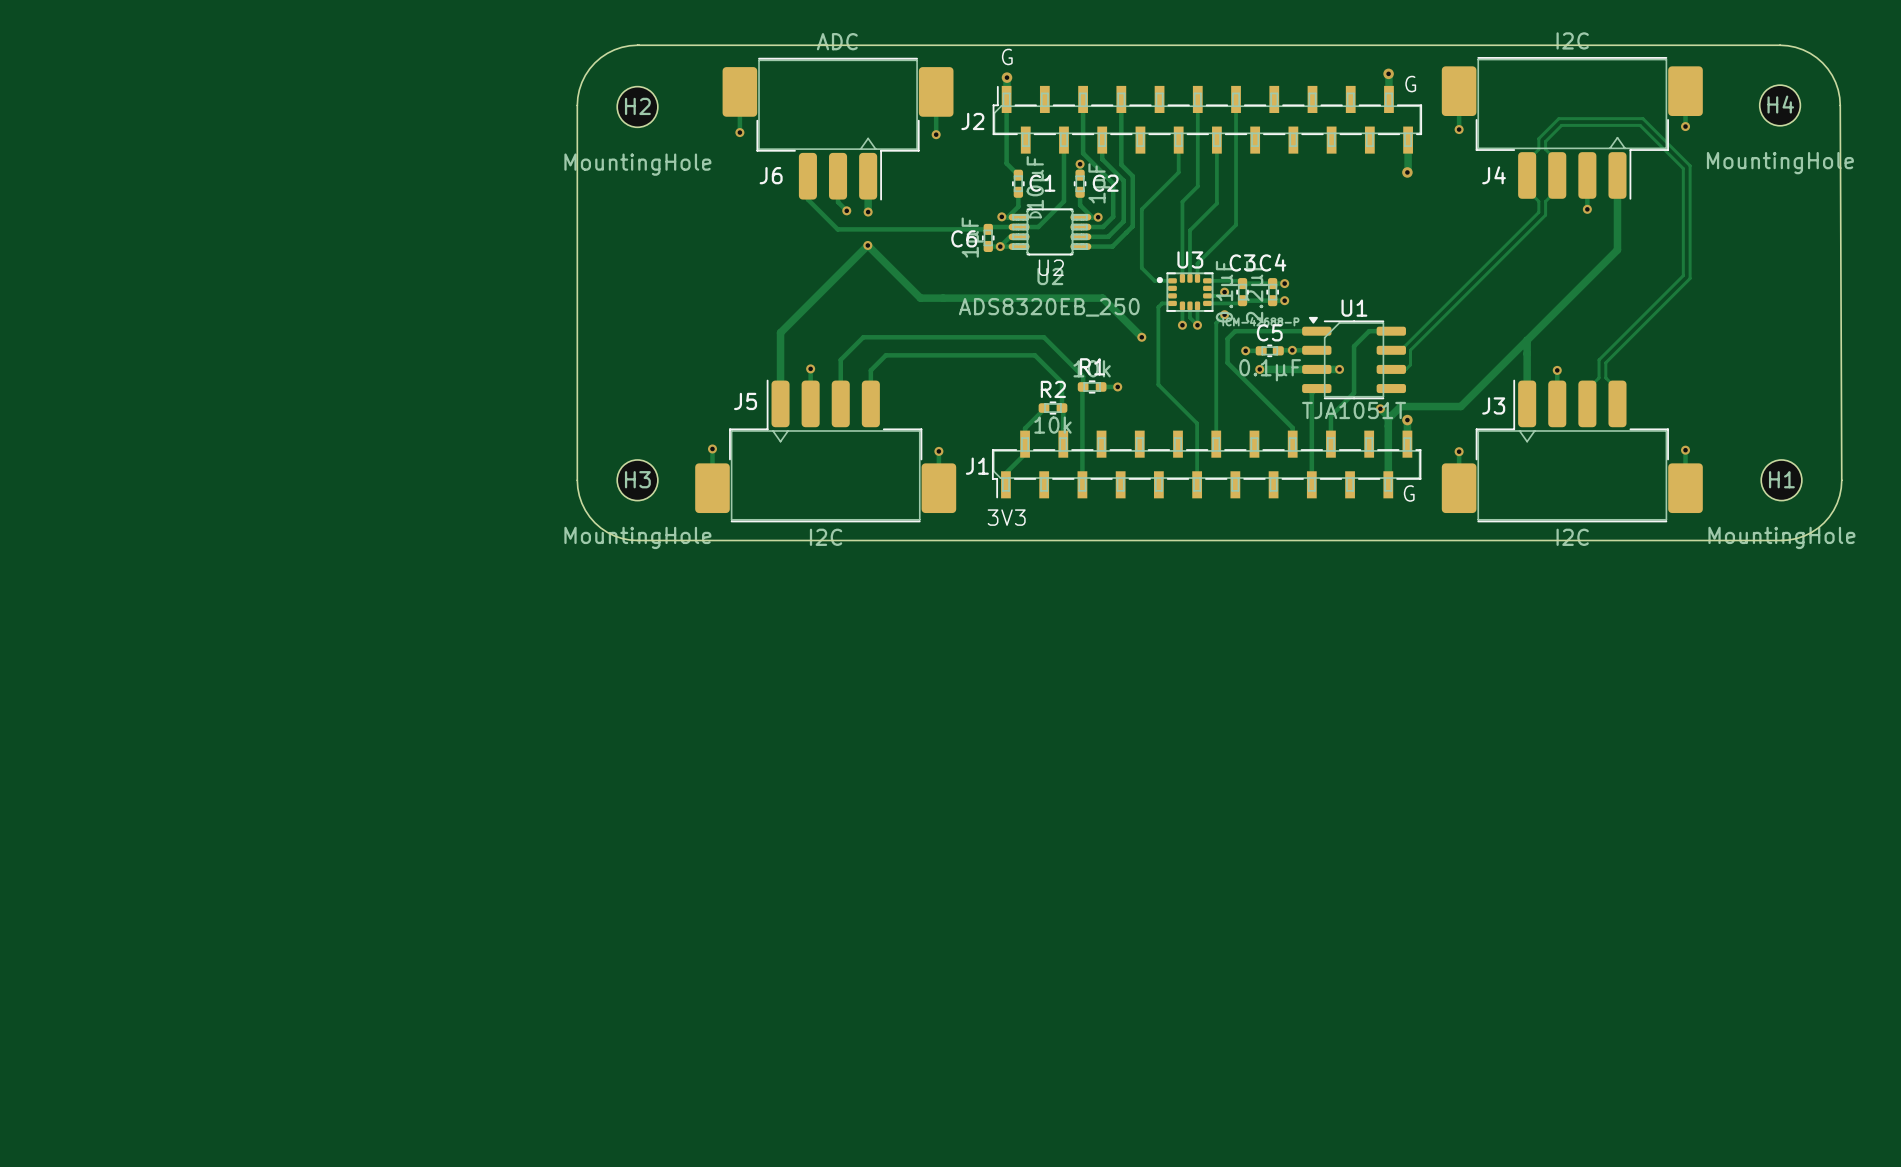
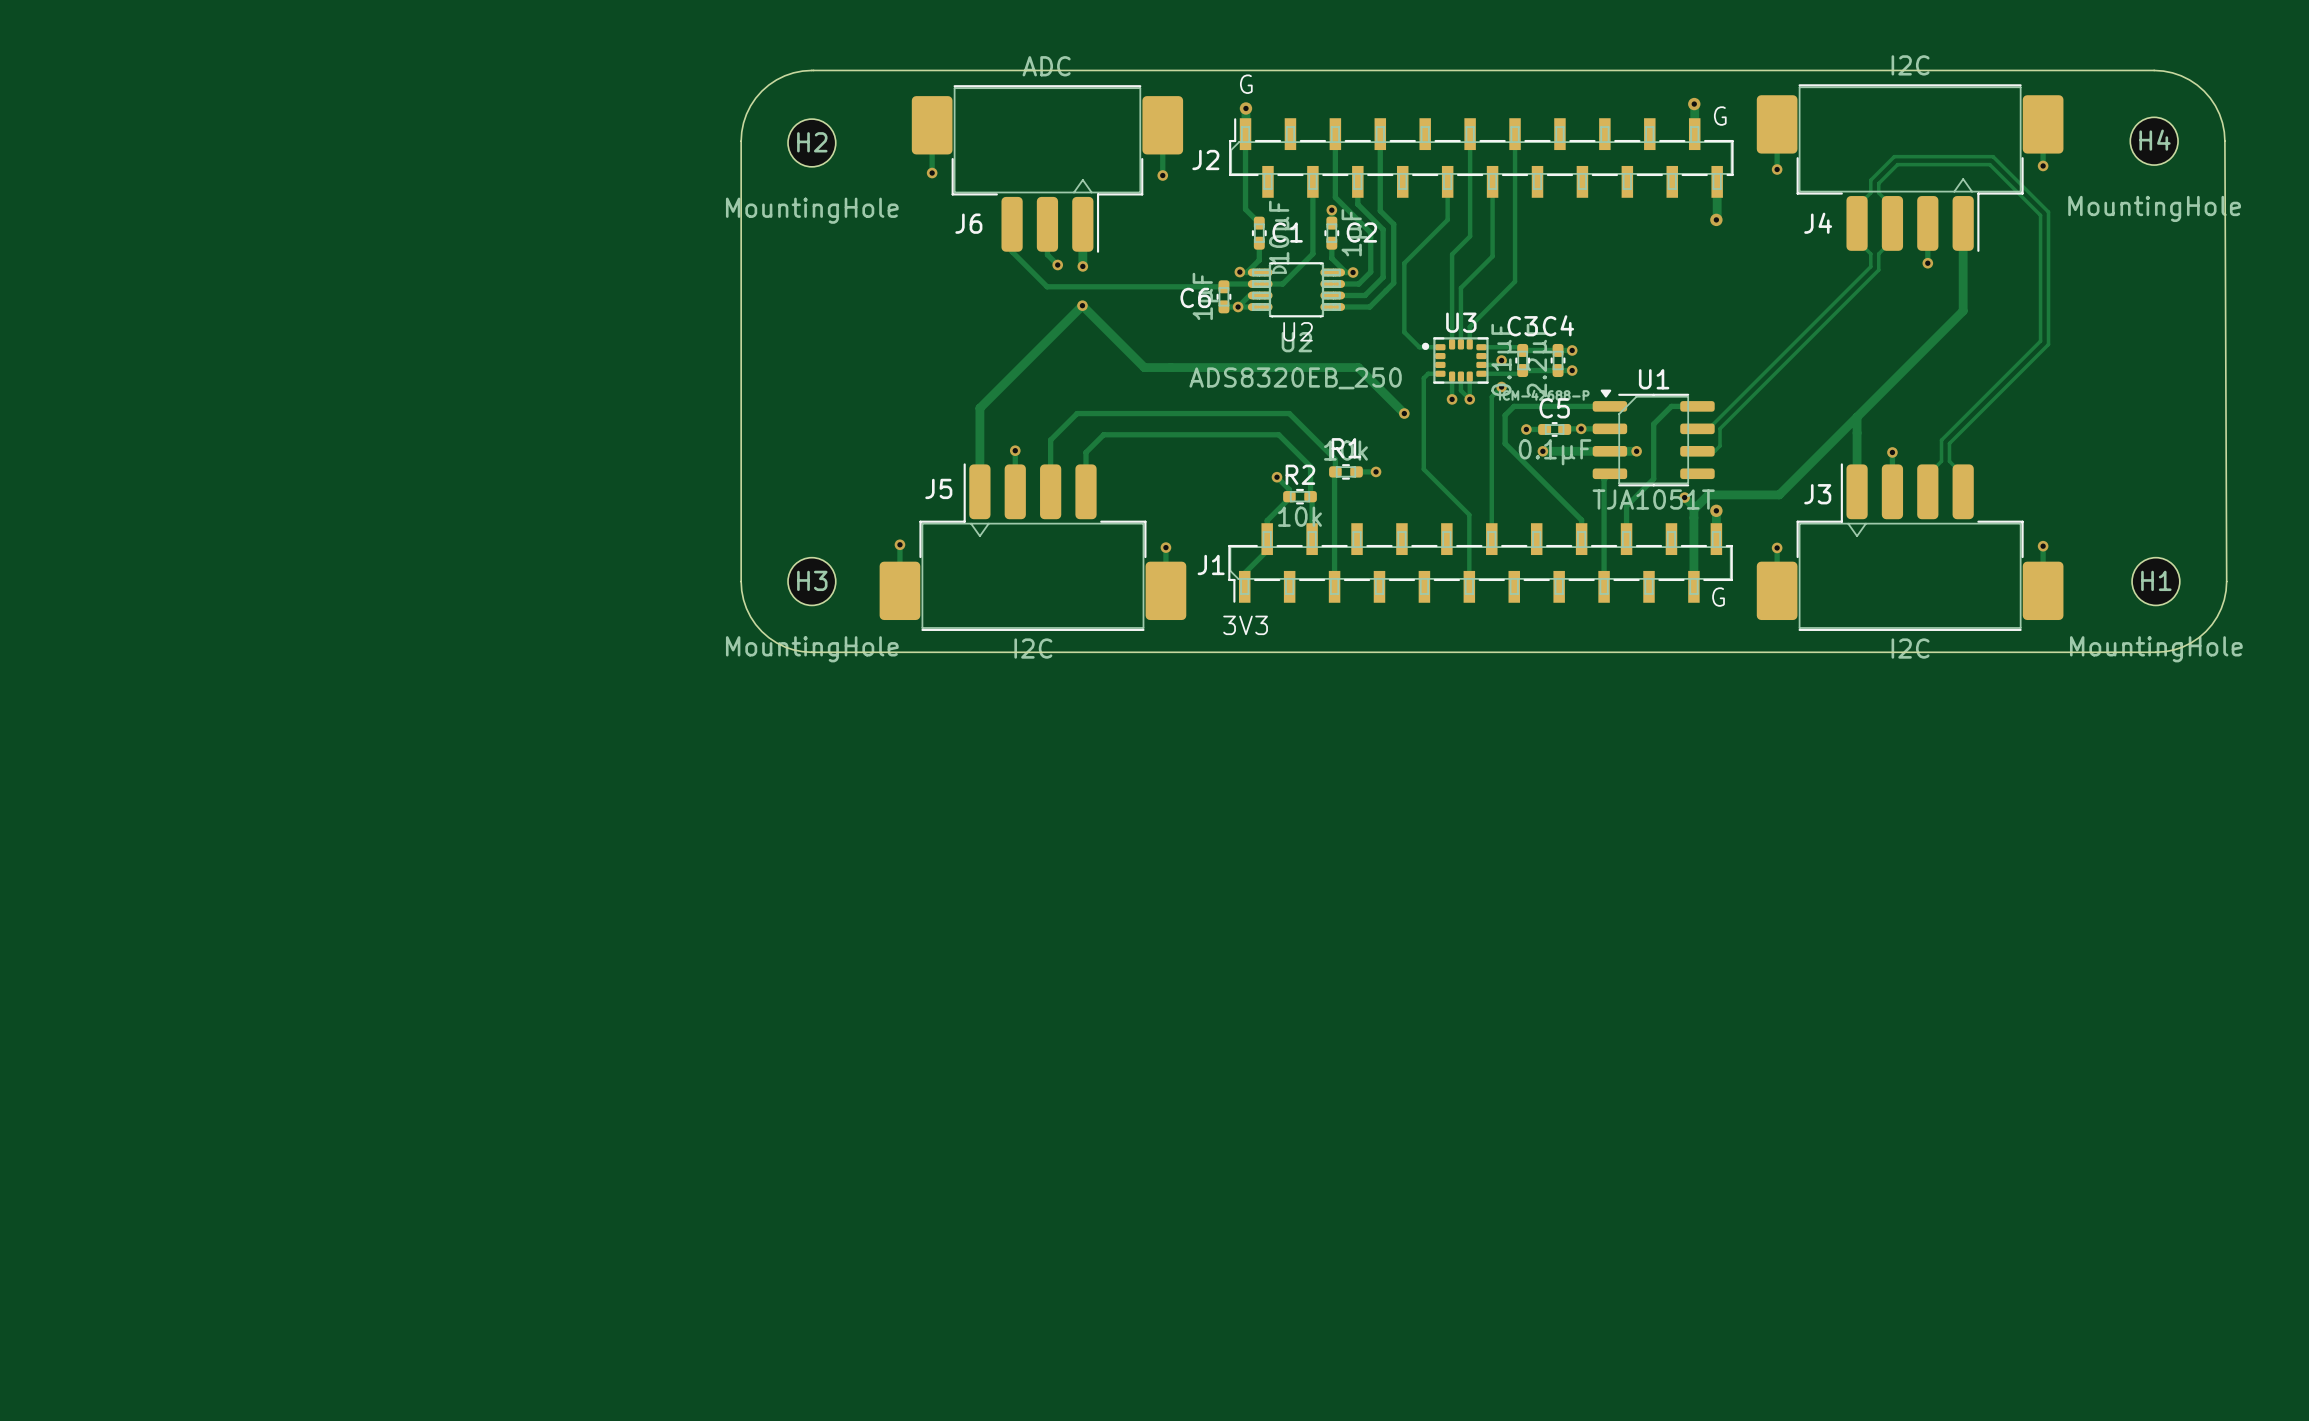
track: none -> (1277, 477) (1289, 489) (1289, 496)
via: none -> (1277, 477)

